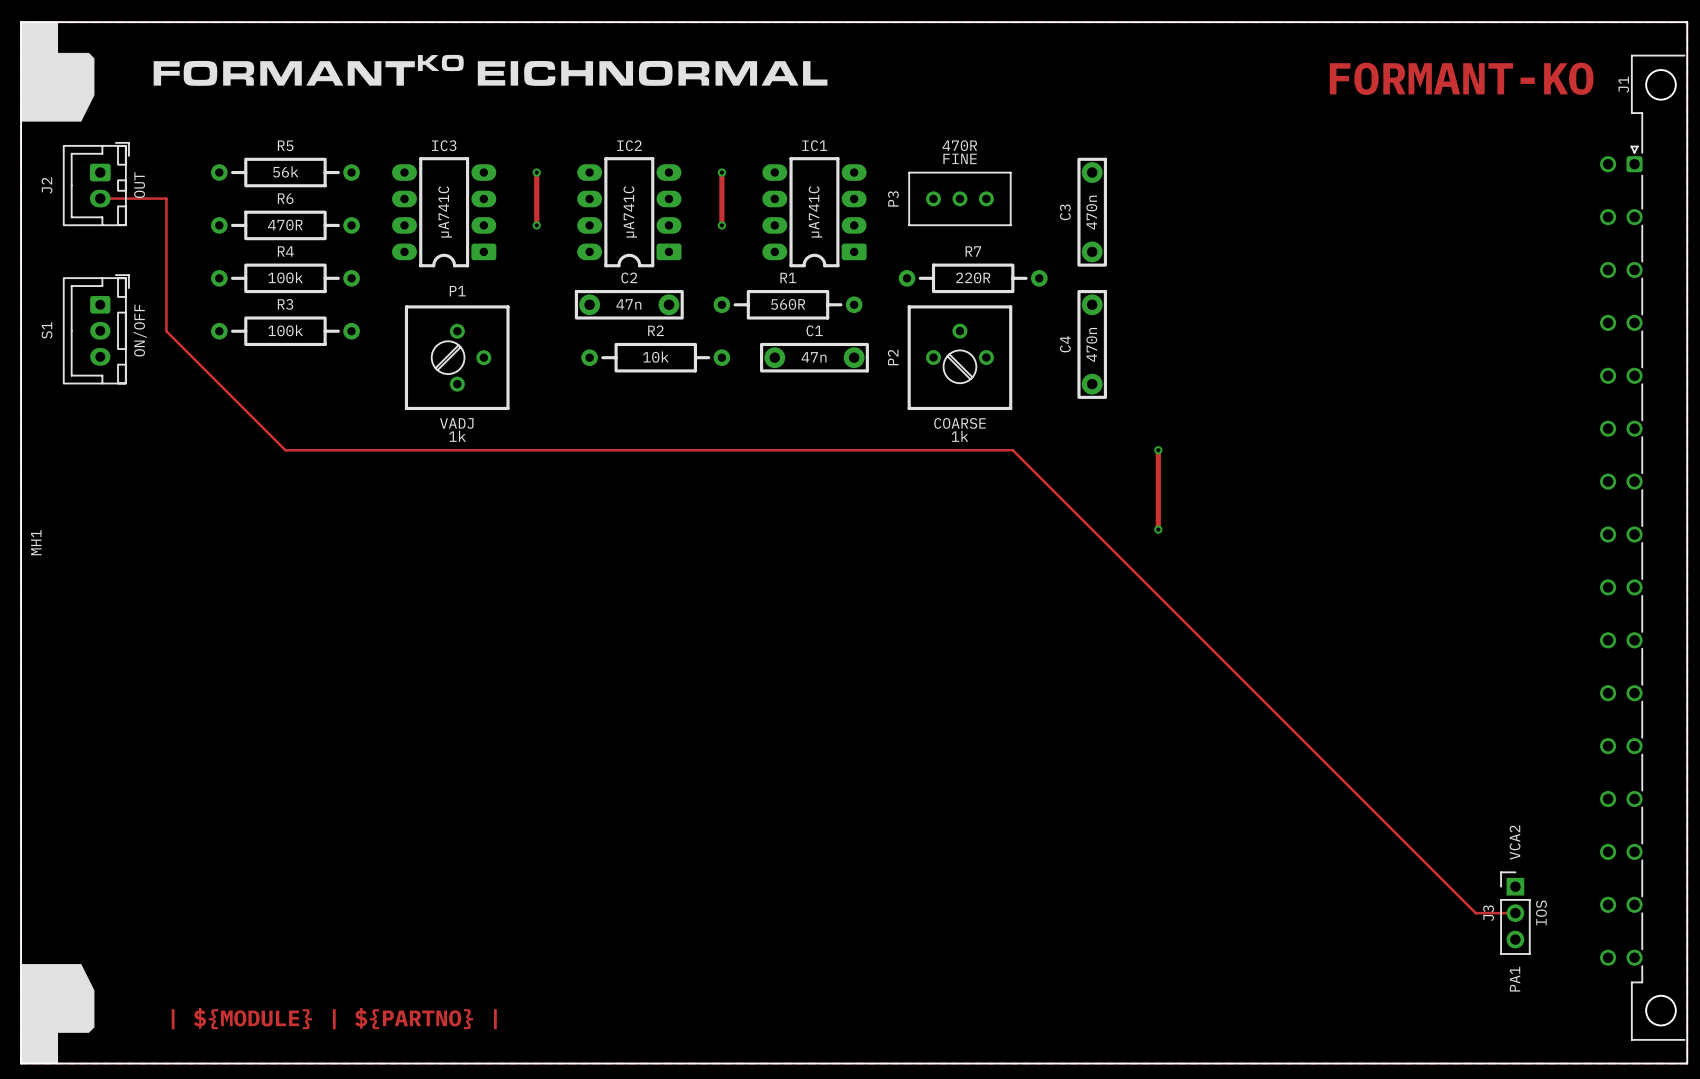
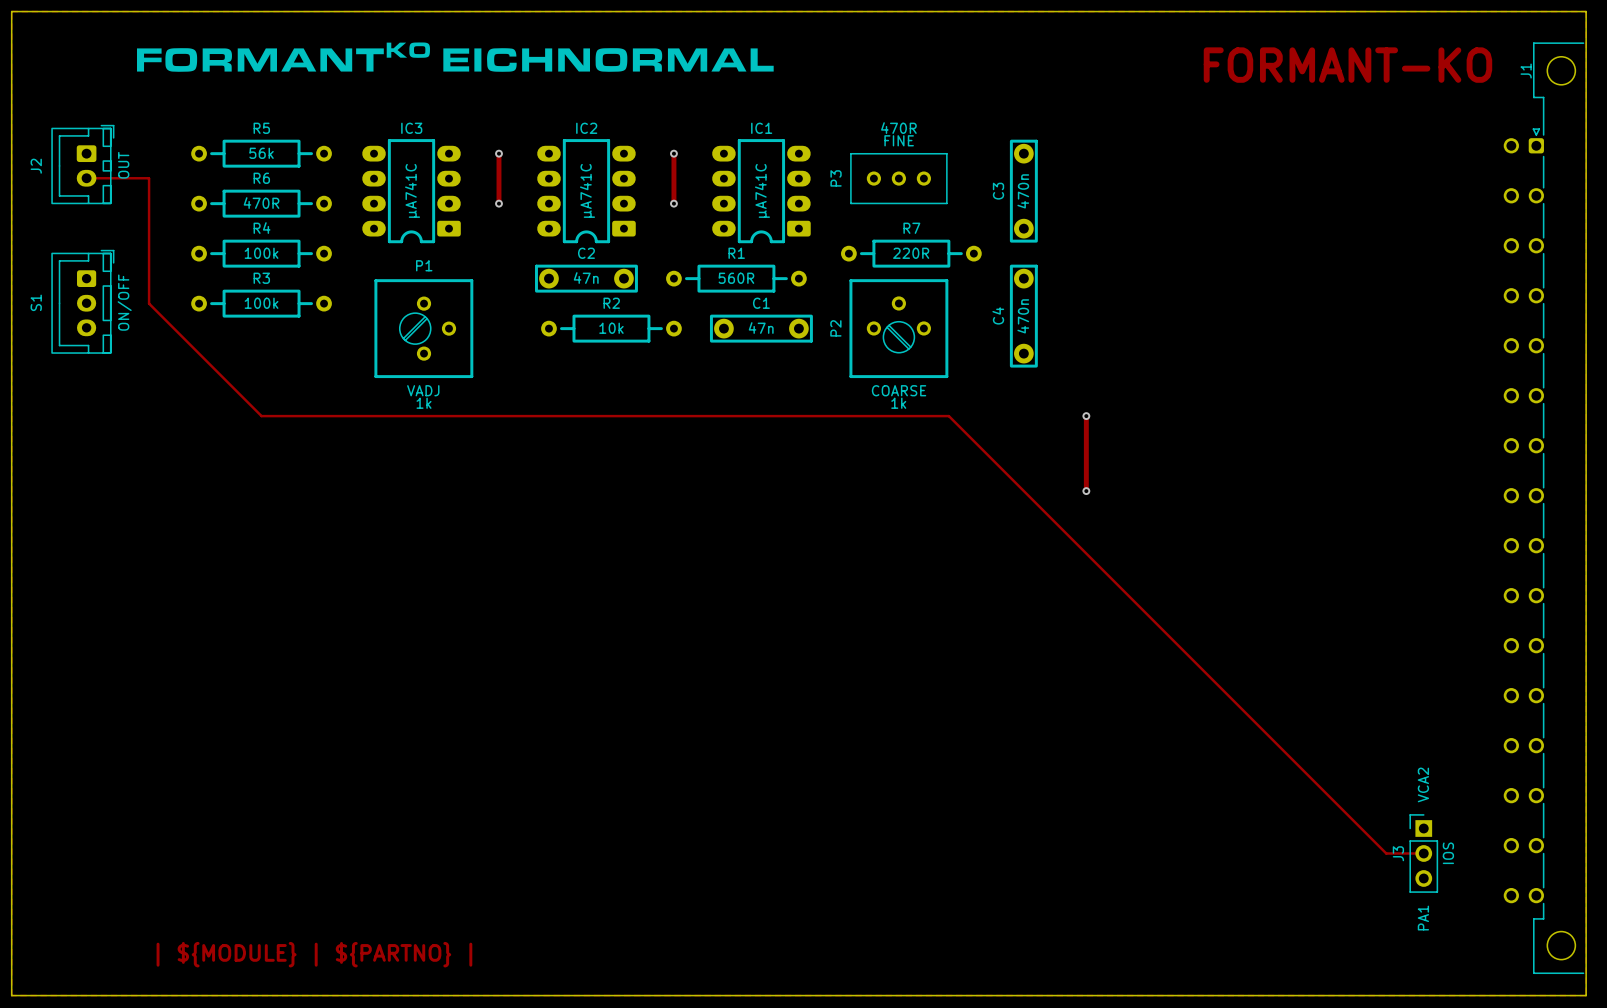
MH1: (57, 542) -> none

